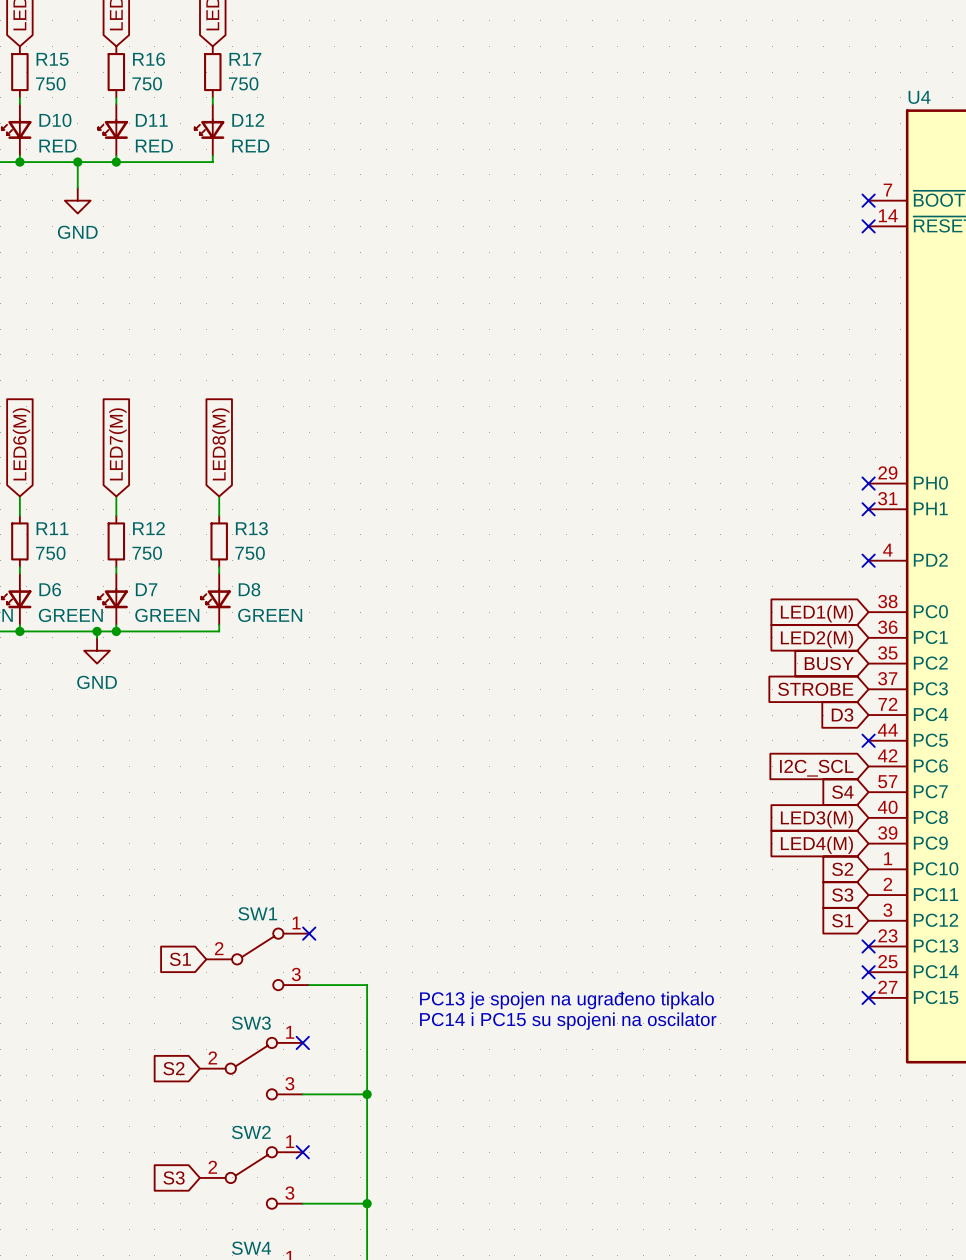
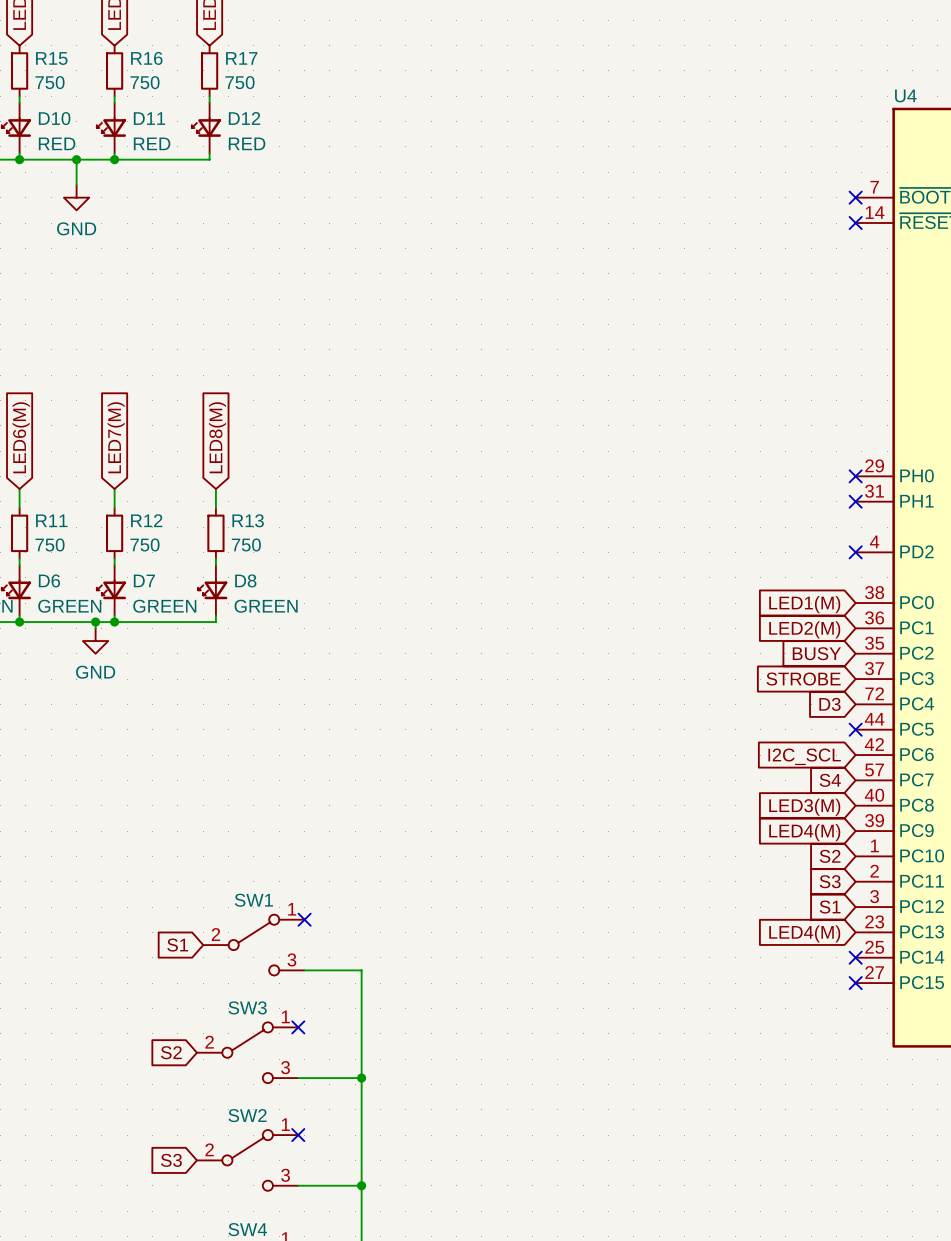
no-connect mark: (868, 946) -> none
global label: none -> LED4(M) (804, 933)
text: PC13 je spojen na ugrađeno tipkalo (566, 1000) -> none
text: PC14 i PC15 su spojeni na oscilator (568, 1021) -> none

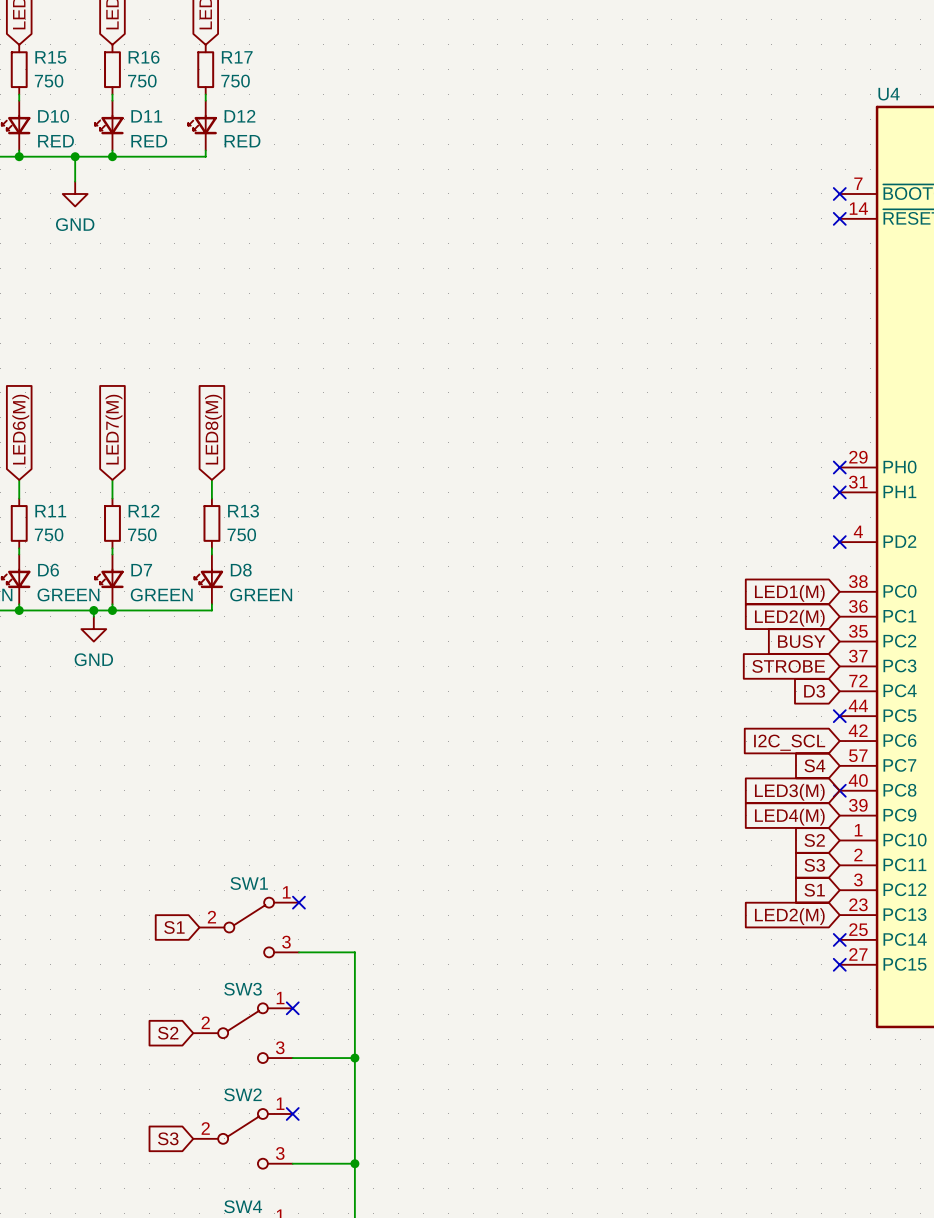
no-connect mark: none -> (839, 790)
global label: LED4(M) (804, 933) -> LED2(M) (789, 916)

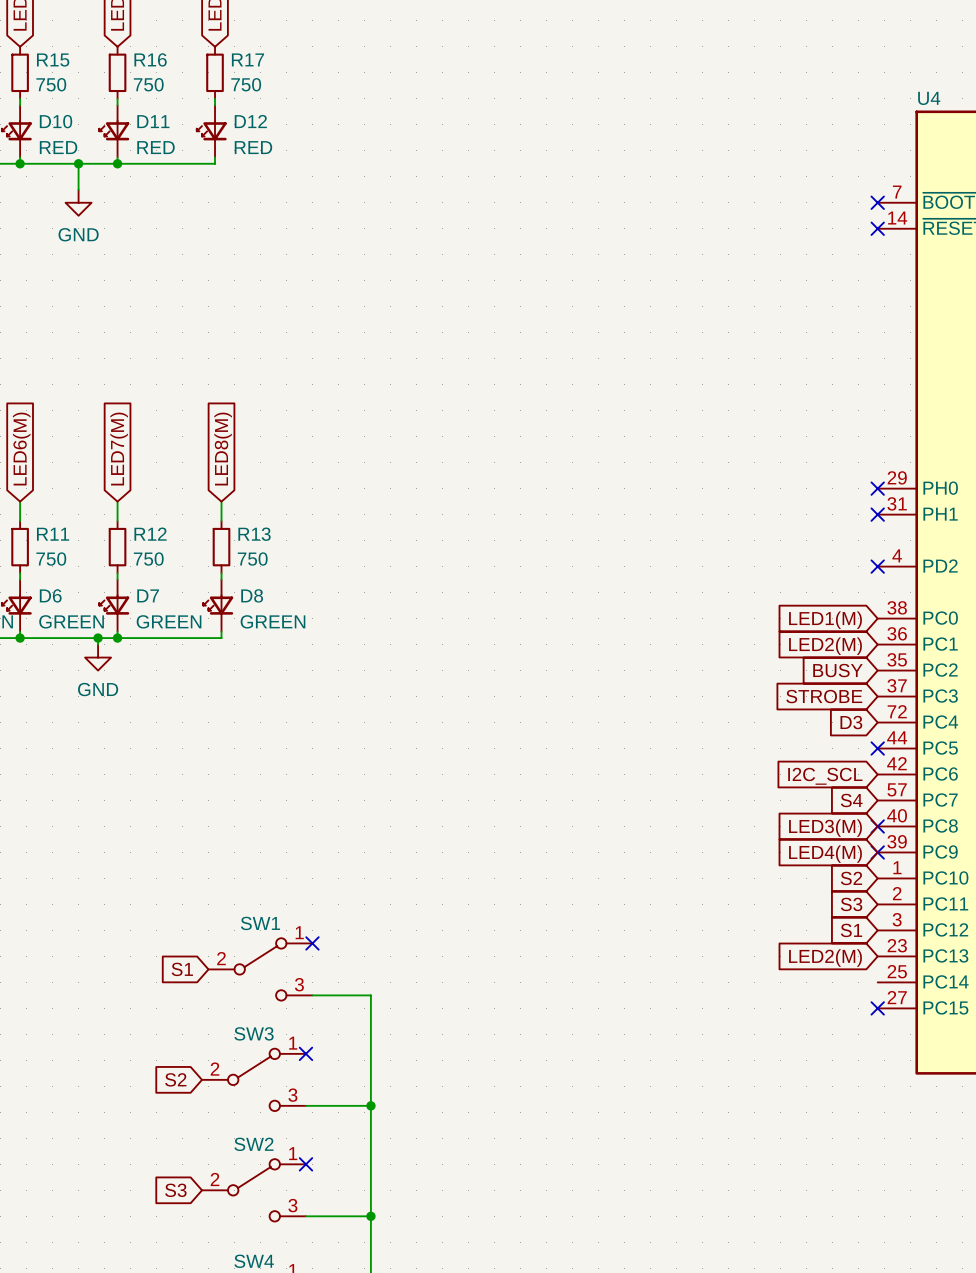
no-connect mark: none -> (877, 852)
no-connect mark: (839, 939) -> none

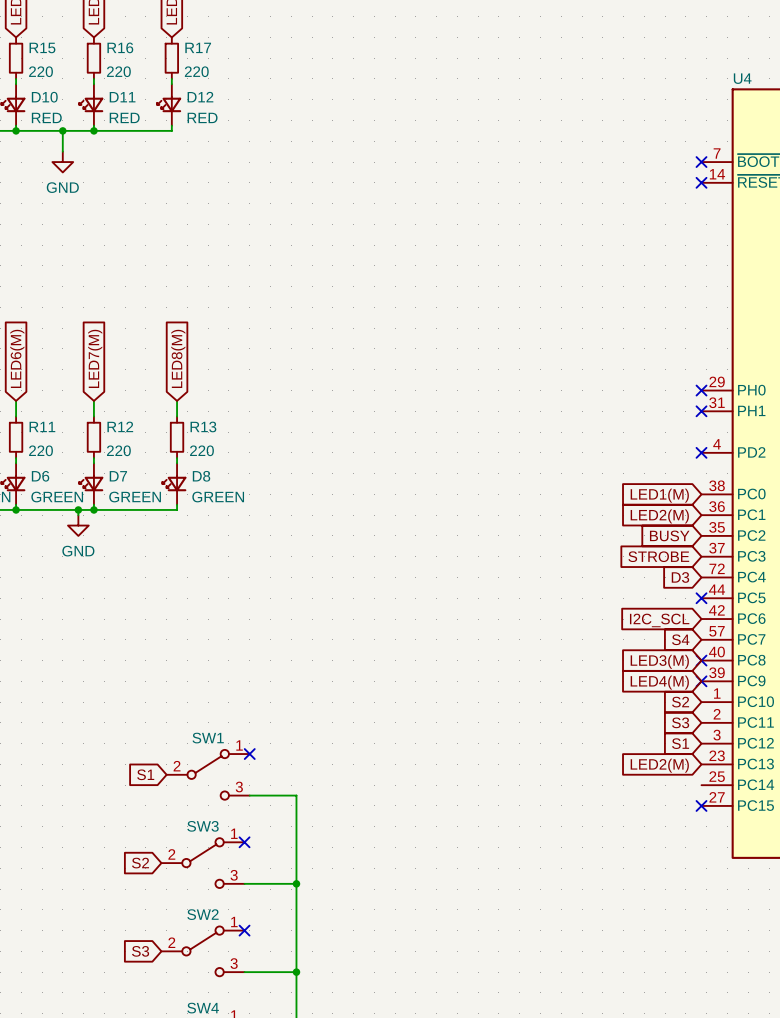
R15 value: 750 (51, 84) -> 220 (40, 71)
R16 value: 750 (148, 84) -> 220 (118, 71)
R17 value: 750 (246, 84) -> 220 (196, 71)
R11 value: 750 (51, 559) -> 220 (40, 450)
R12 value: 750 (148, 559) -> 220 (118, 450)
R13 value: 750 (252, 559) -> 220 (201, 450)

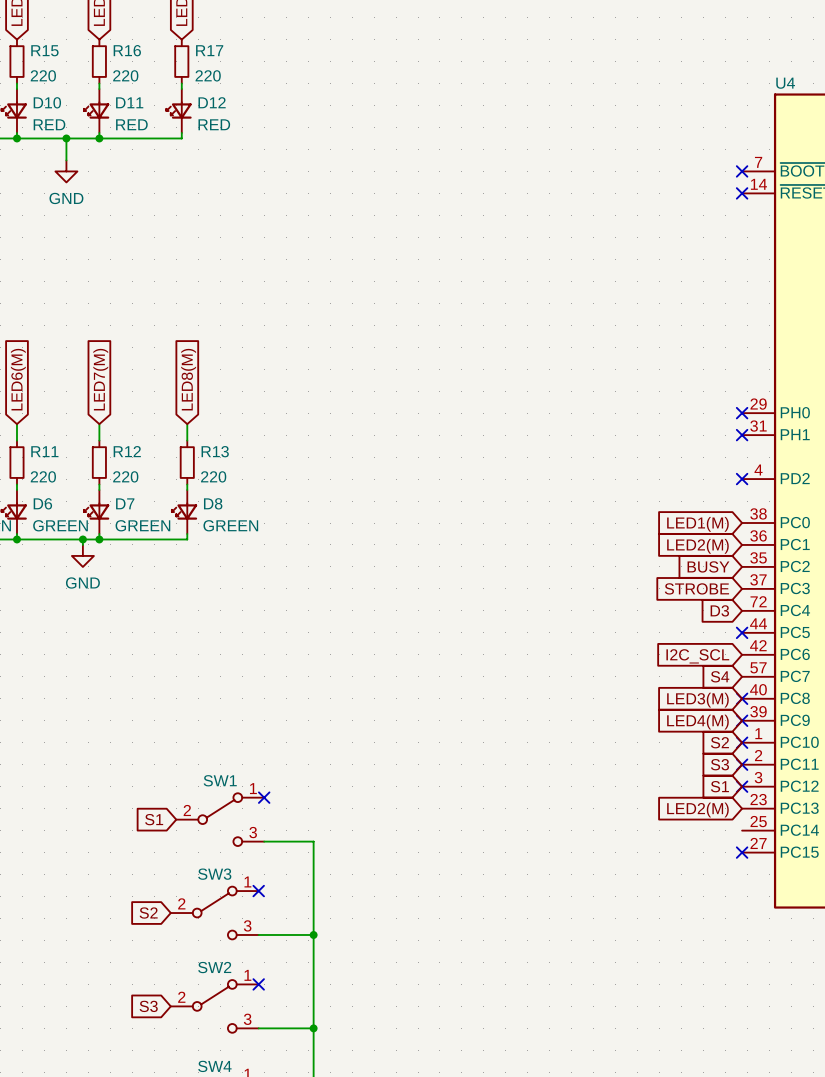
no-connect mark: none -> (742, 742)
no-connect mark: none -> (742, 764)
no-connect mark: none -> (742, 786)

